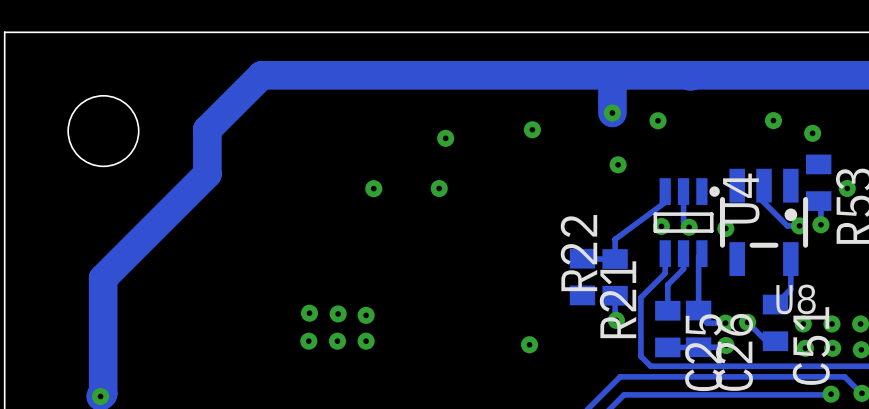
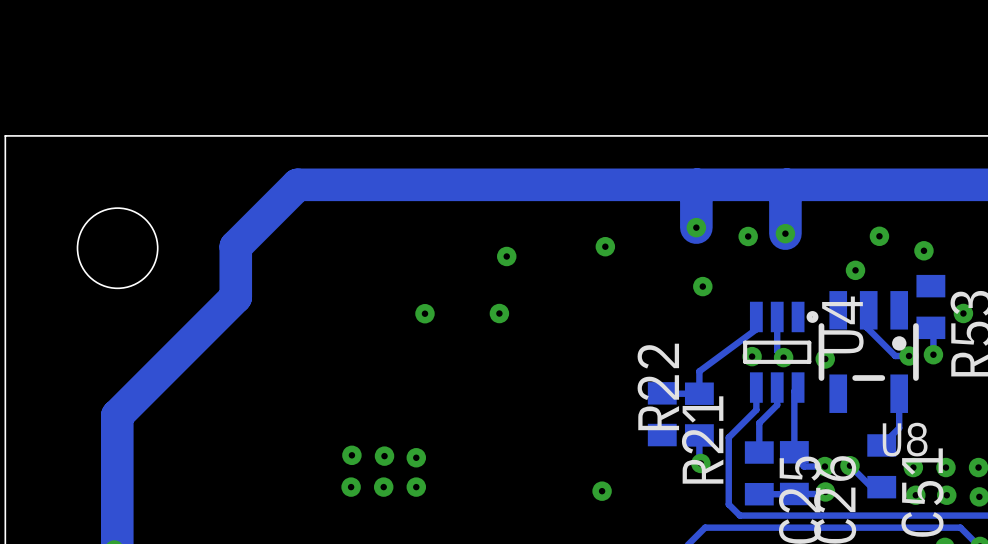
track: none -> (785, 186) (785, 233)
via: none -> (785, 233)
via: none -> (855, 270)

